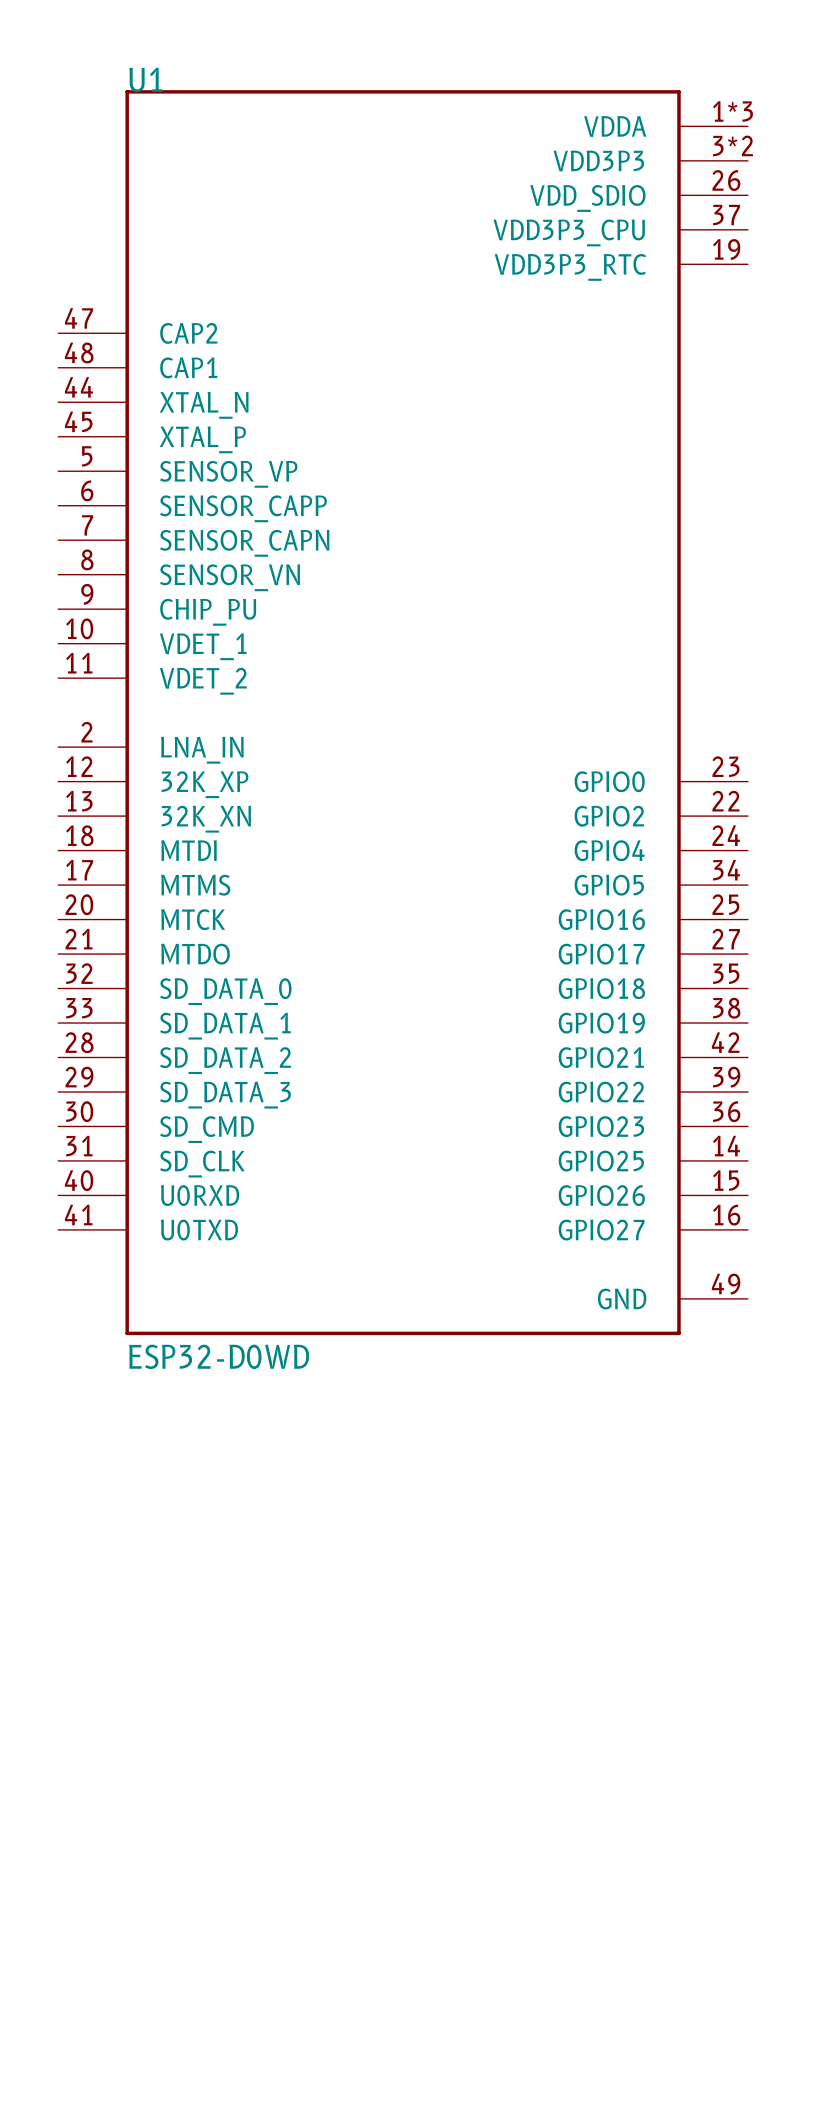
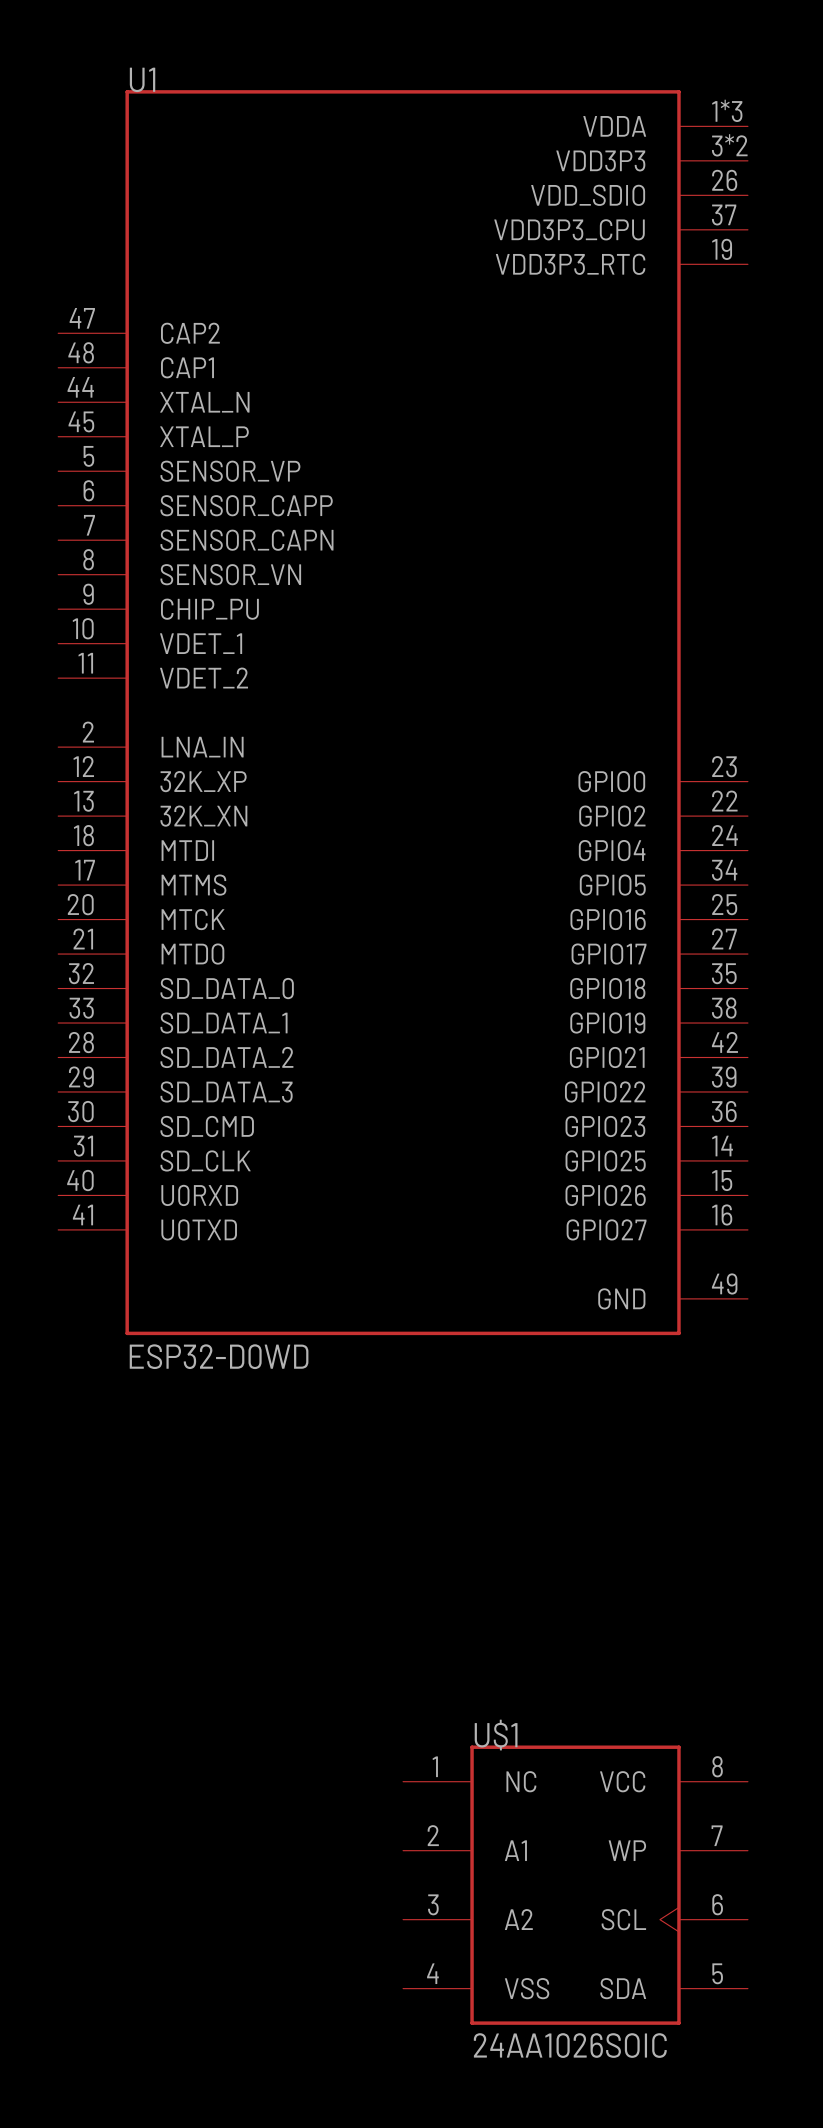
U$1: none -> 24AA1026SOIC (575, 1885)

